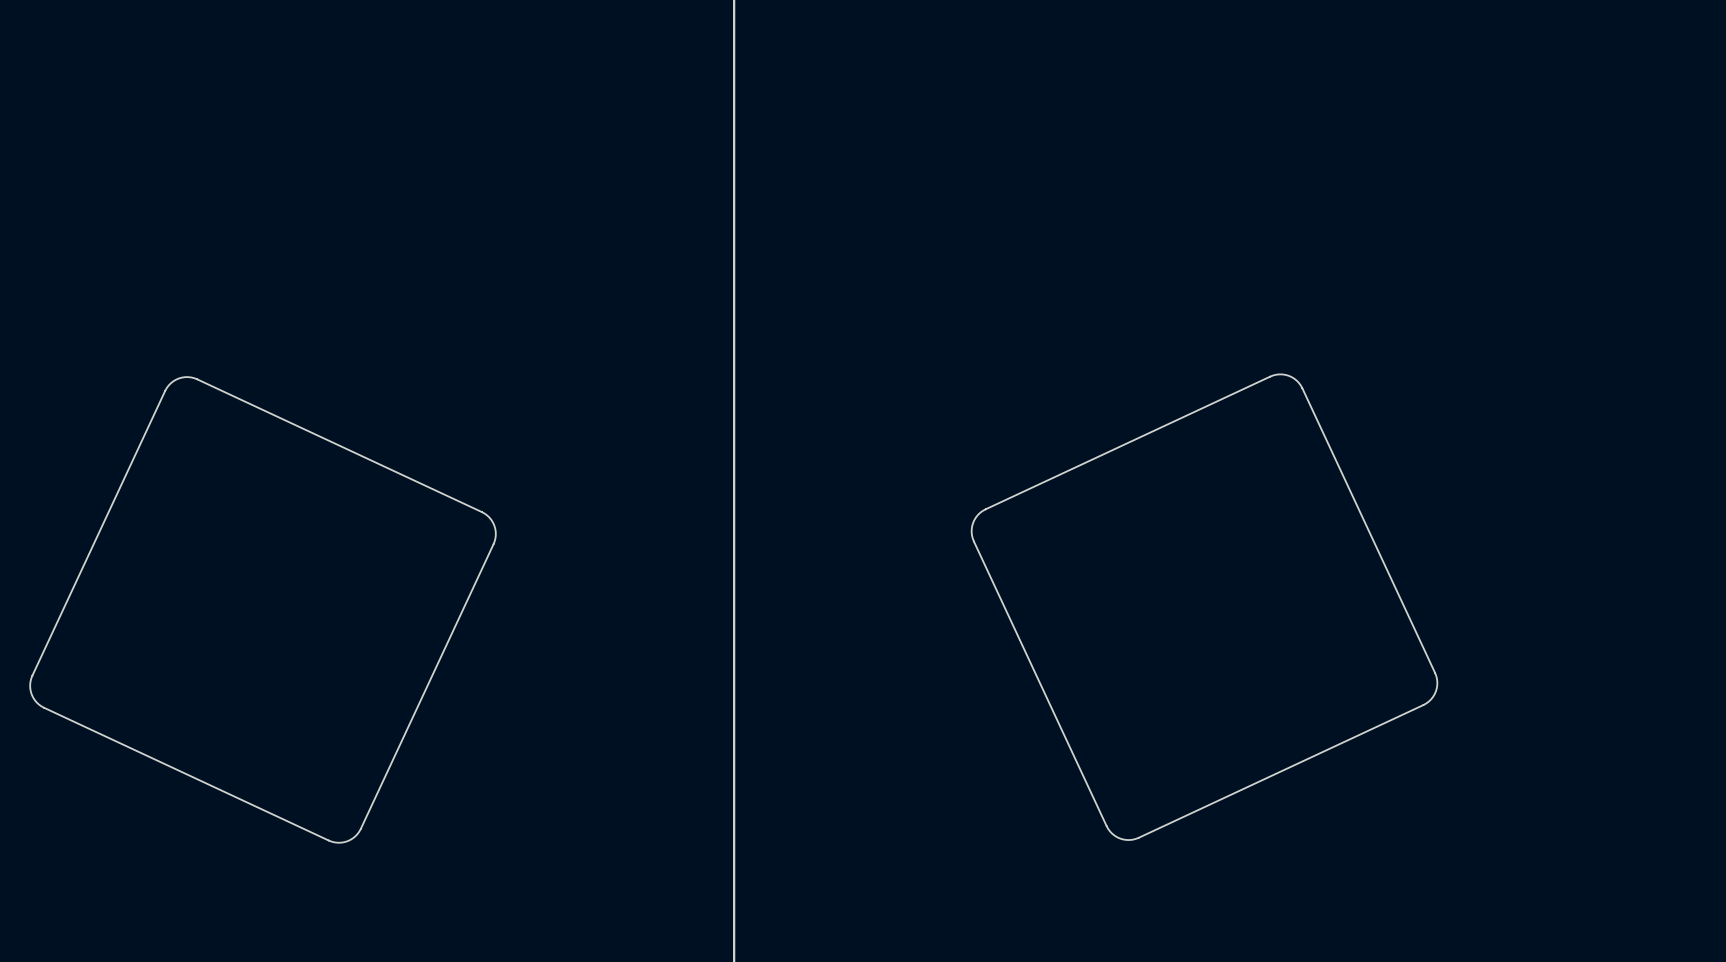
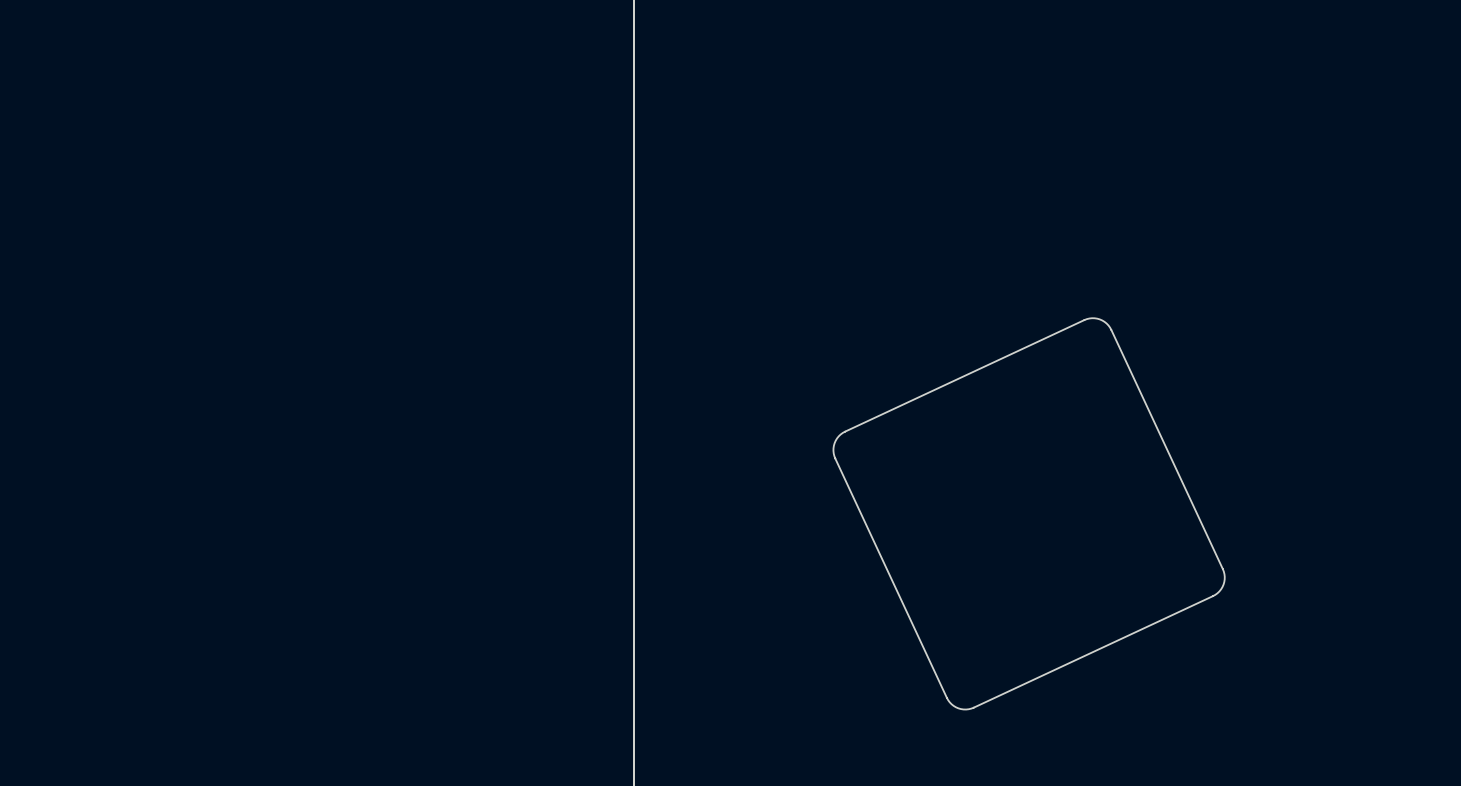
board edge: (197, 379) (481, 512) (489, 517) (494, 525) (495, 535) (493, 544) (360, 828) (355, 836) (347, 841) (337, 842) (328, 840) (44, 707) (36, 702) (31, 694) (30, 684) (32, 675) (165, 391) (170, 383) (178, 378) (188, 377) (197, 379) -> none

